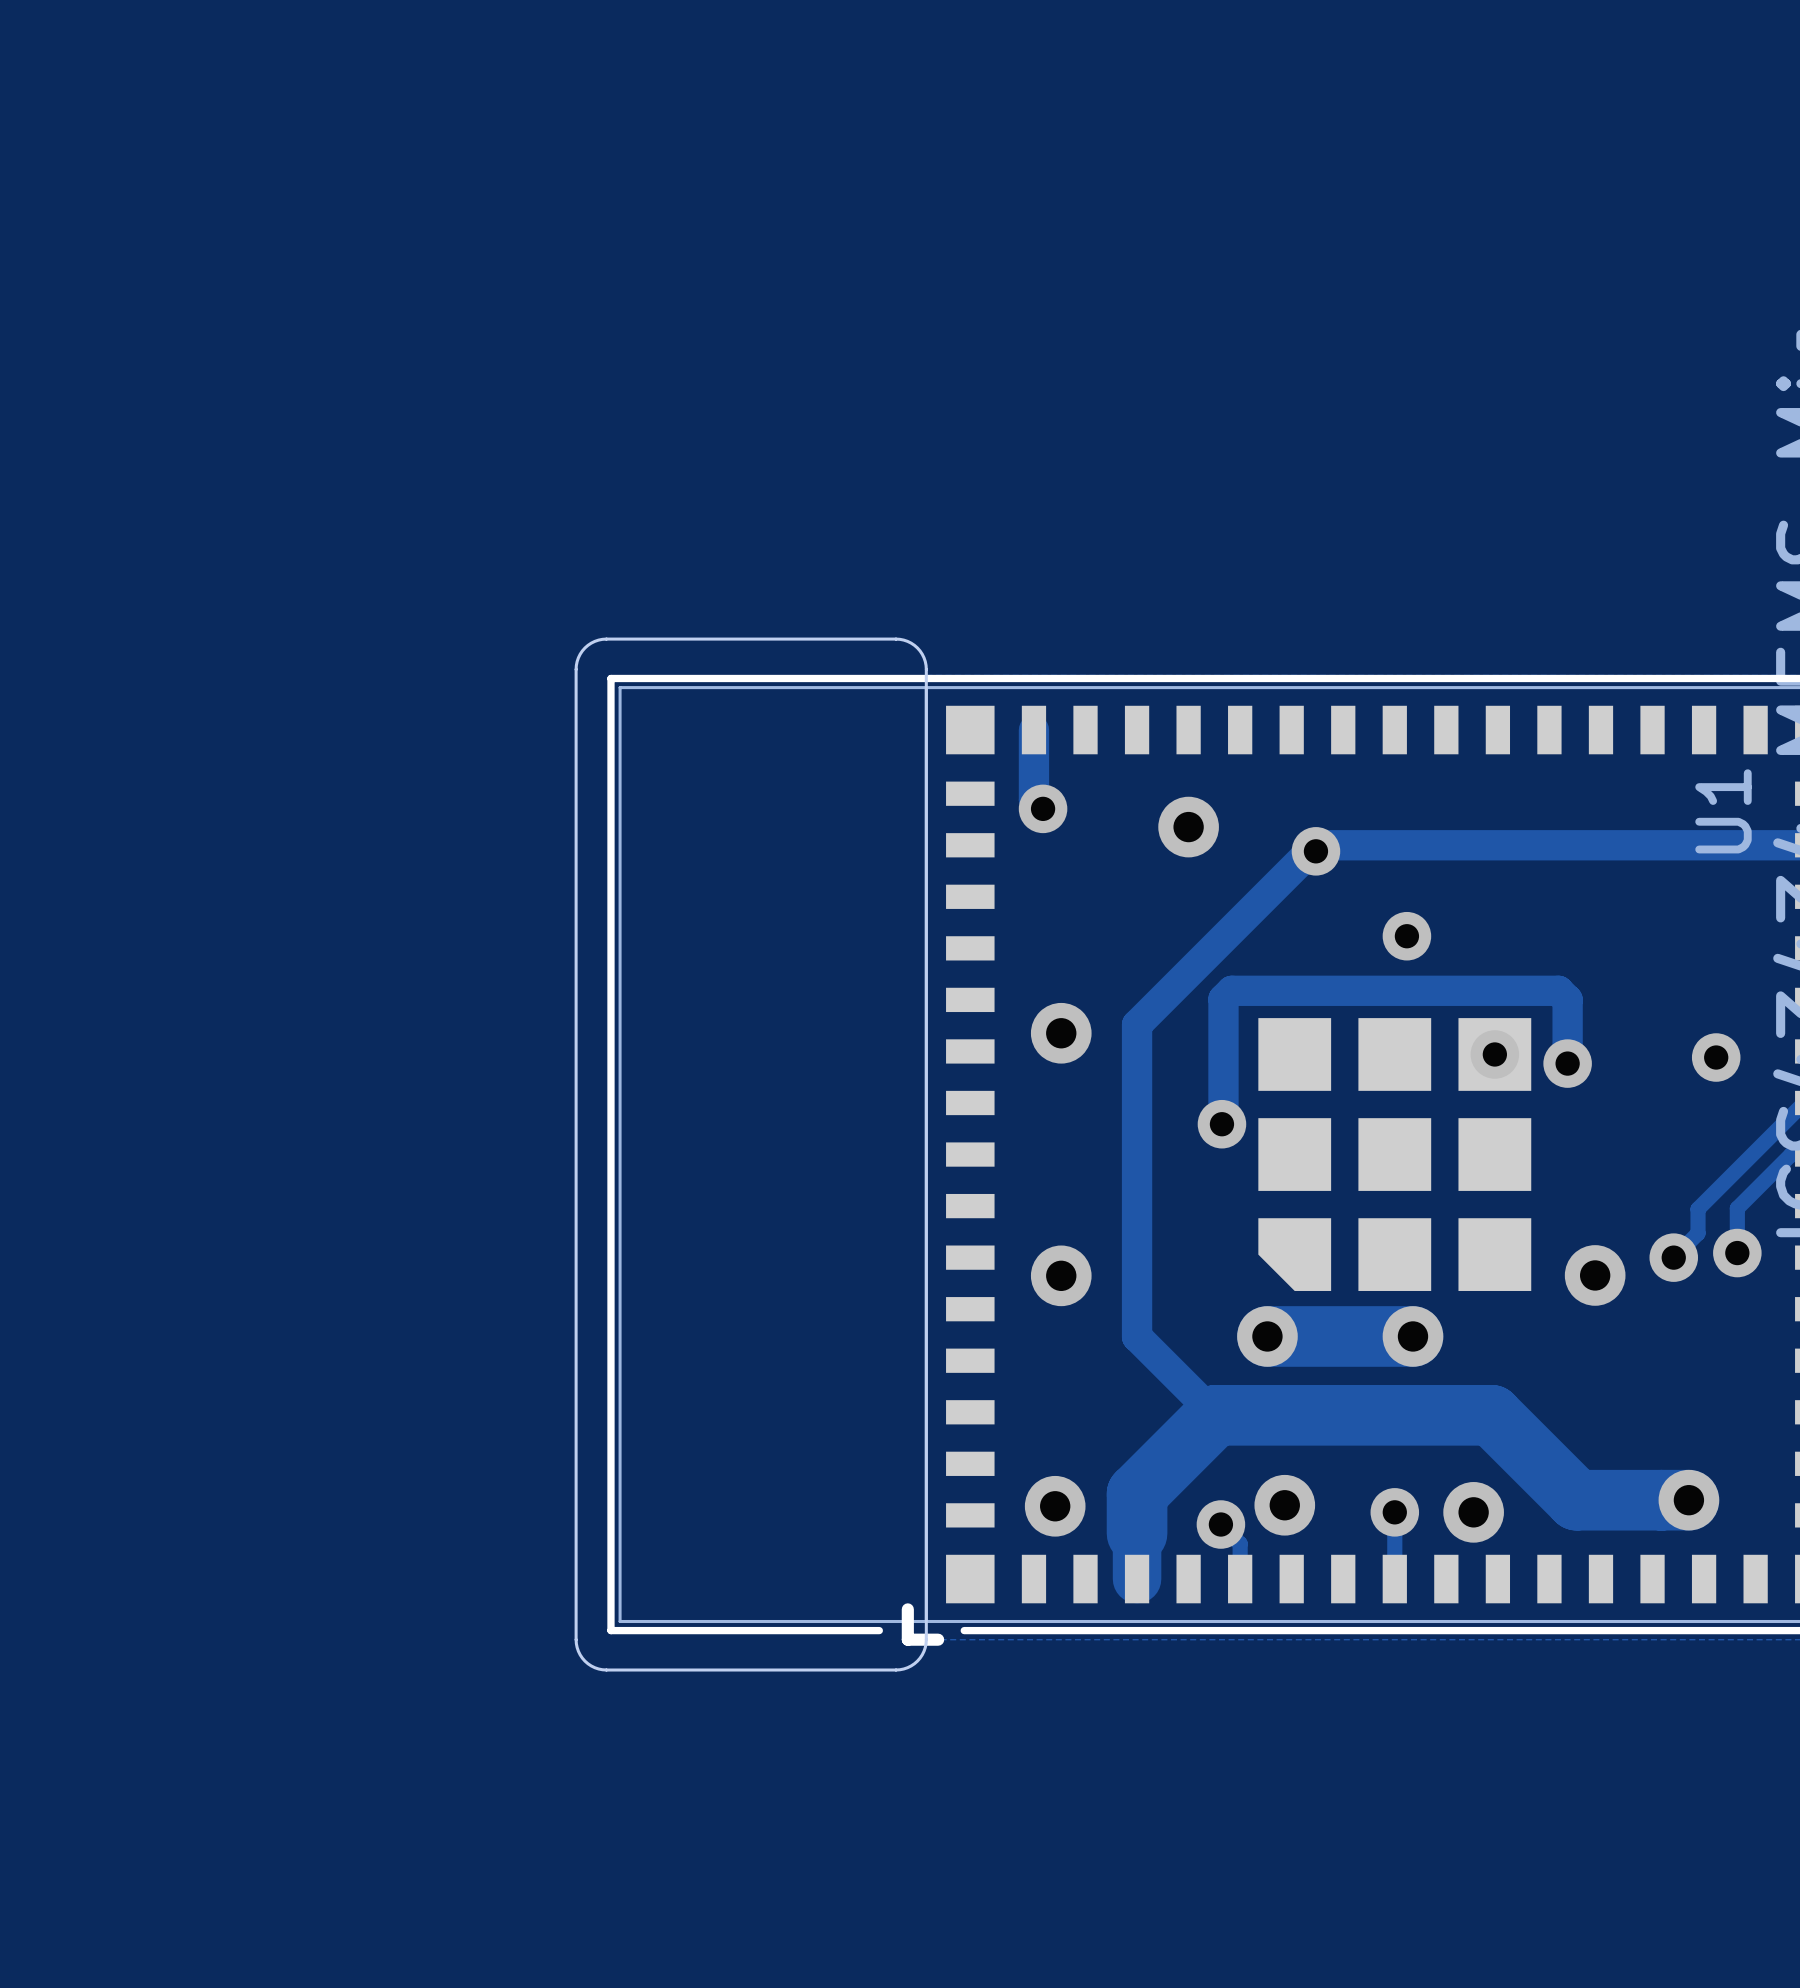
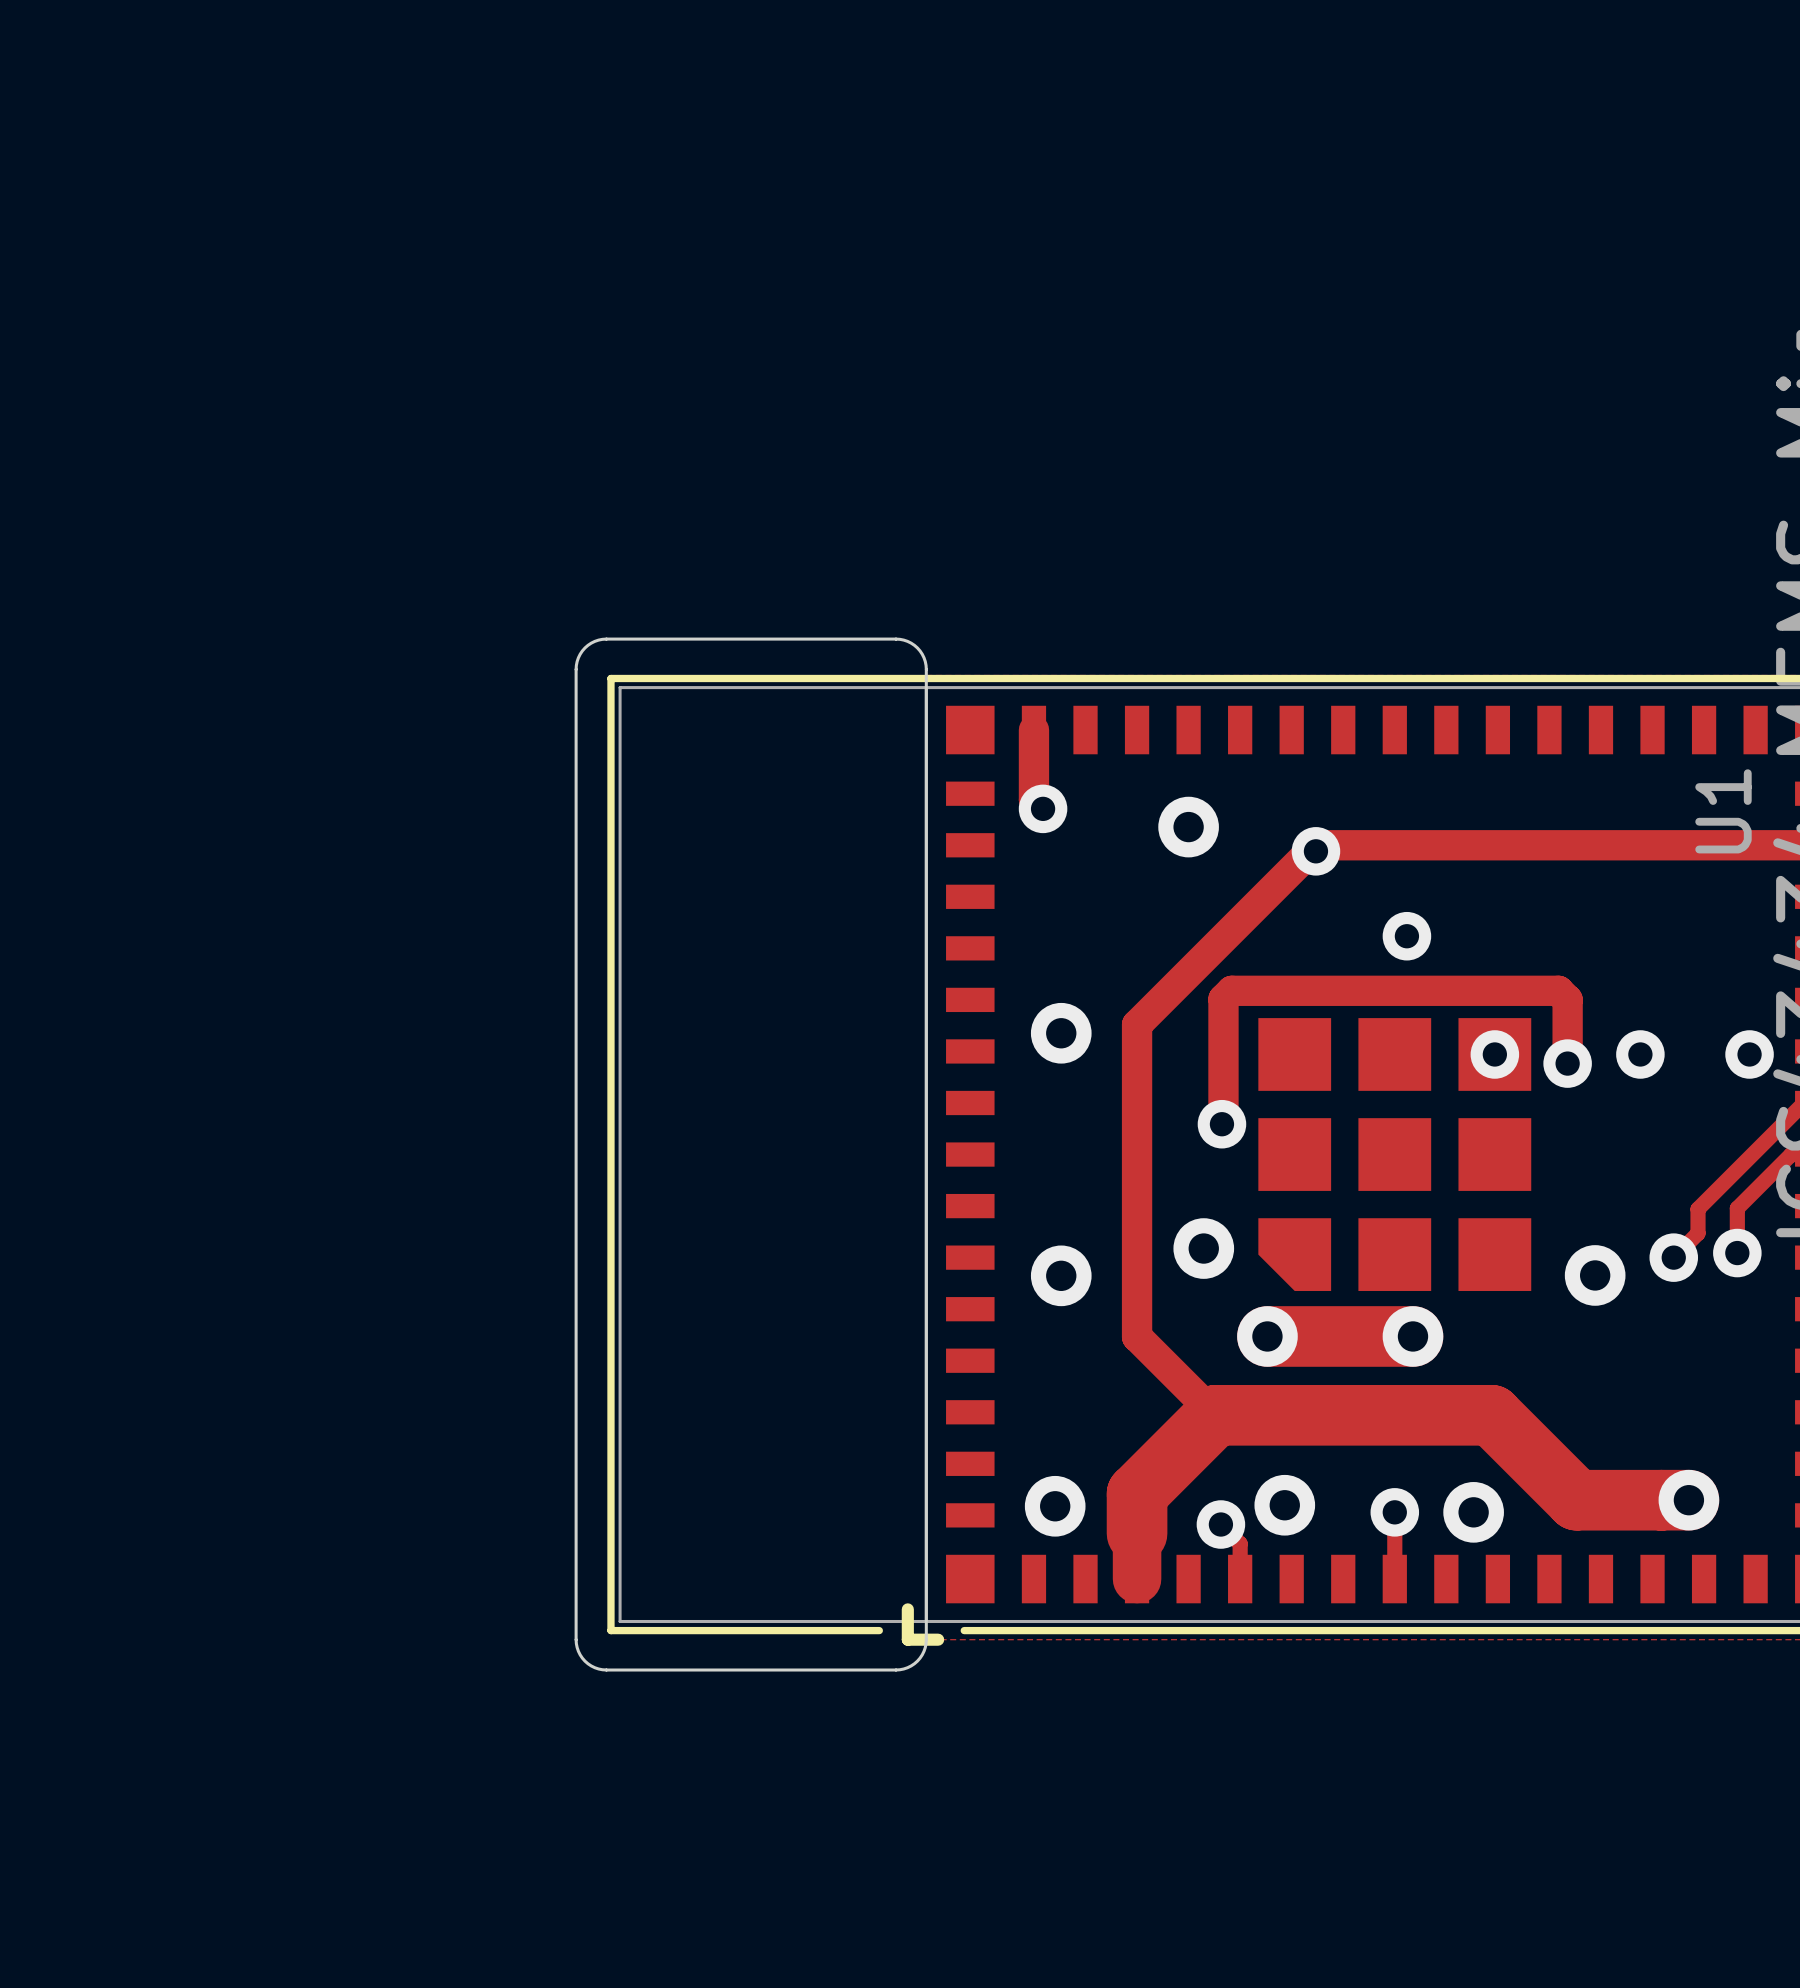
via: none -> (1640, 1054)
via position: (1716, 1057) -> (1749, 1054)
via: none -> (1203, 1248)

